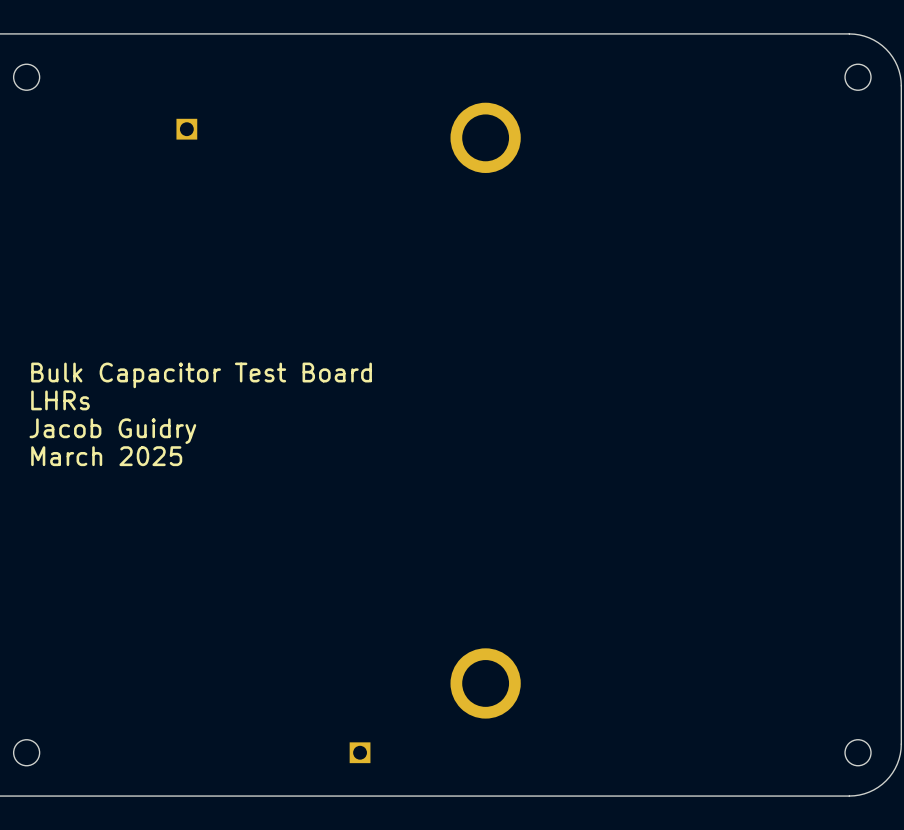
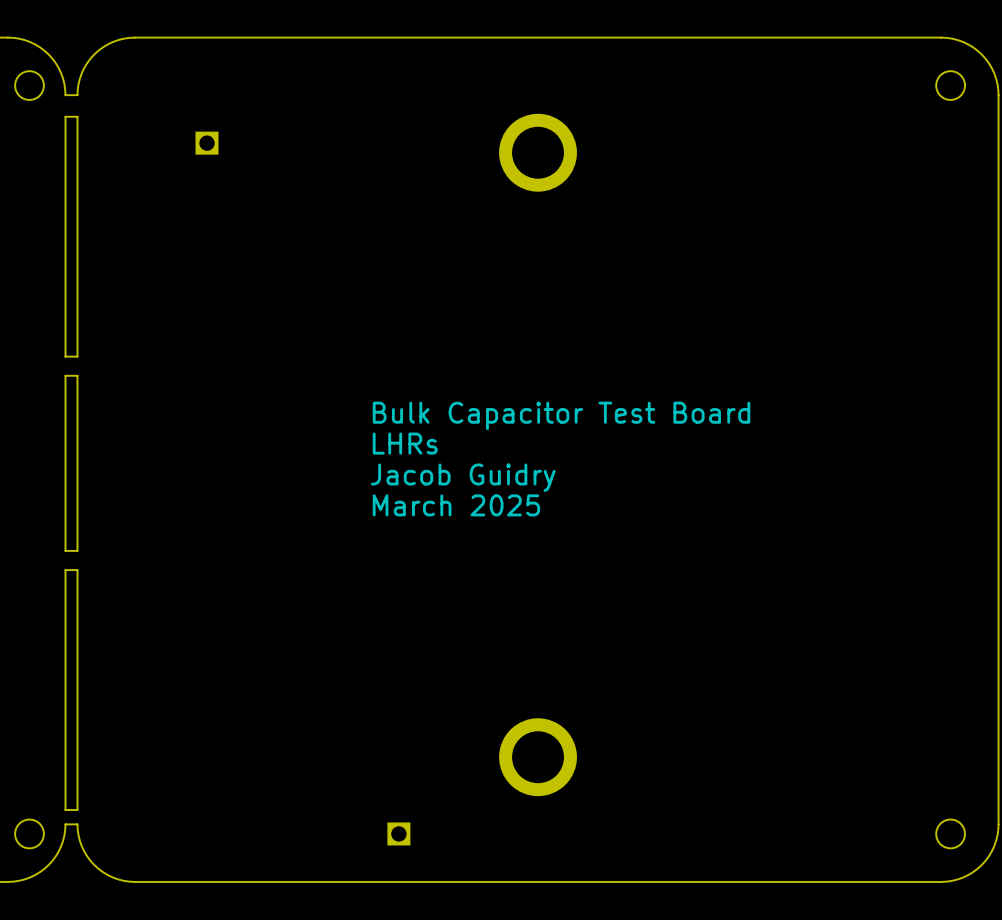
board edge: (121, 33) (7, 33) -> (135, 37) (113, 41) (94, 54) (81, 73) (77, 95) (65, 95) (61, 73) (52, 58) (44, 50) (24, 40) (7, 37)
board edge: none -> (77, 116) (77, 356) (65, 356) (65, 116) (77, 116)
board edge: none -> (77, 375) (77, 550) (65, 550) (65, 375) (77, 375)
text: Bulk Capacitor Test Board (201, 375) -> none
text: none -> Bulk Capacitor Test Board (561, 415)
text: LHRs (60, 400) -> none
text: none -> LHRs (405, 443)
text: Jacob Guidry (112, 431) -> none
text: none -> Jacob Guidry (463, 477)
text: March 2025 (106, 456) -> none
text: none -> March 2025 (456, 505)
board edge: none -> (77, 570) (77, 809) (65, 809) (65, 570) (77, 570)
board edge: (121, 796) (7, 796) -> (135, 881) (113, 877) (94, 865) (81, 846) (77, 824) (65, 824) (63, 841) (58, 851) (44, 868) (24, 879) (7, 881)

